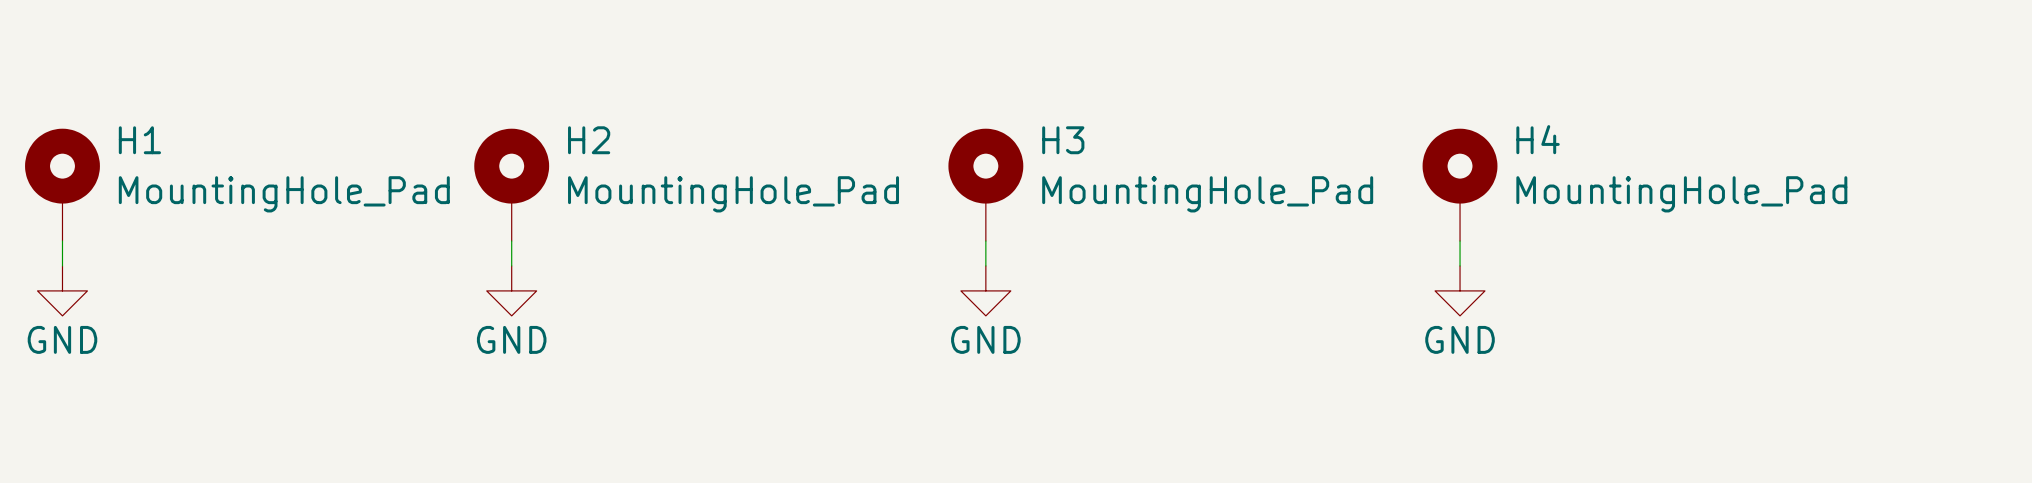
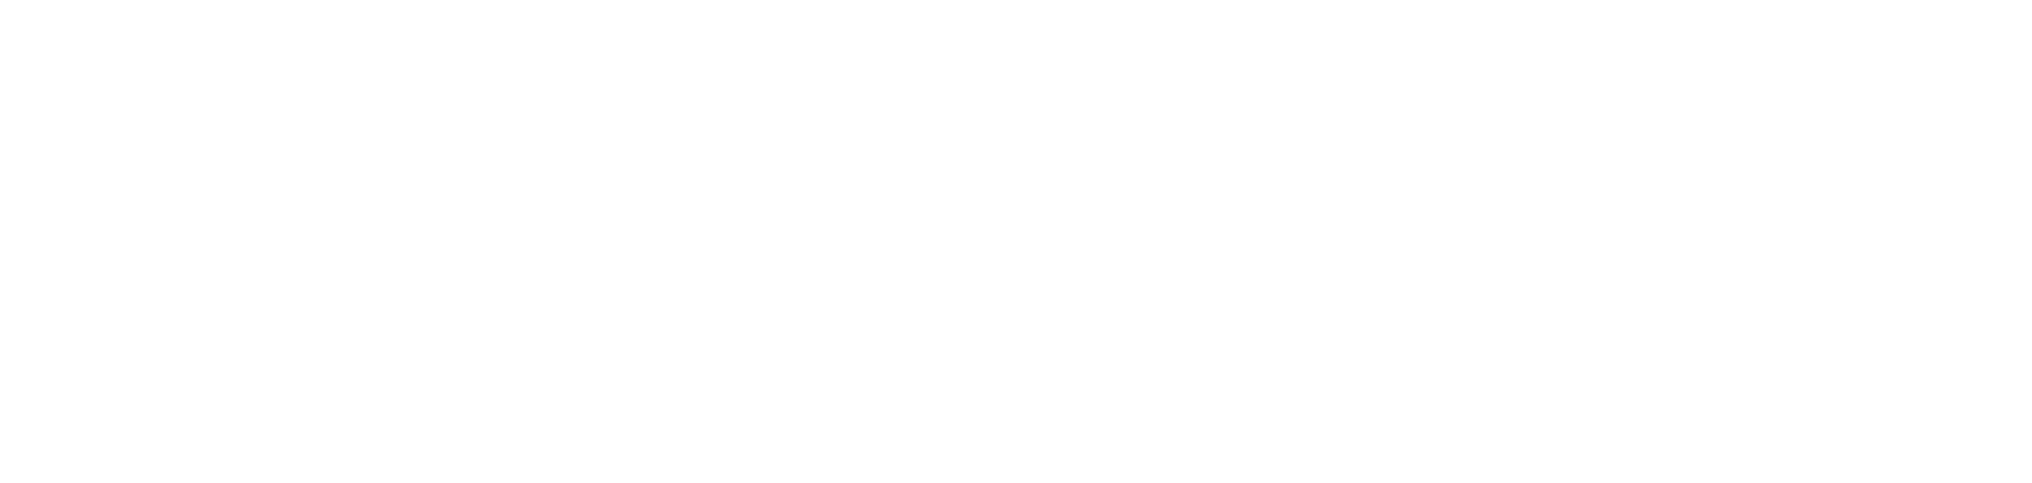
H1: MountingHole_Pad (62, 184) -> none
H2: MountingHole_Pad (511, 184) -> none
H3: MountingHole_Pad (985, 184) -> none
H4: MountingHole_Pad (1460, 184) -> none
wire: (62, 241) (62, 265) -> none
wire: (511, 241) (511, 265) -> none
wire: (985, 241) (985, 265) -> none
wire: (1460, 241) (1460, 265) -> none
power symbol: GND (62, 290) -> none
power symbol: GND (511, 290) -> none
power symbol: GND (985, 290) -> none
power symbol: GND (1460, 290) -> none

